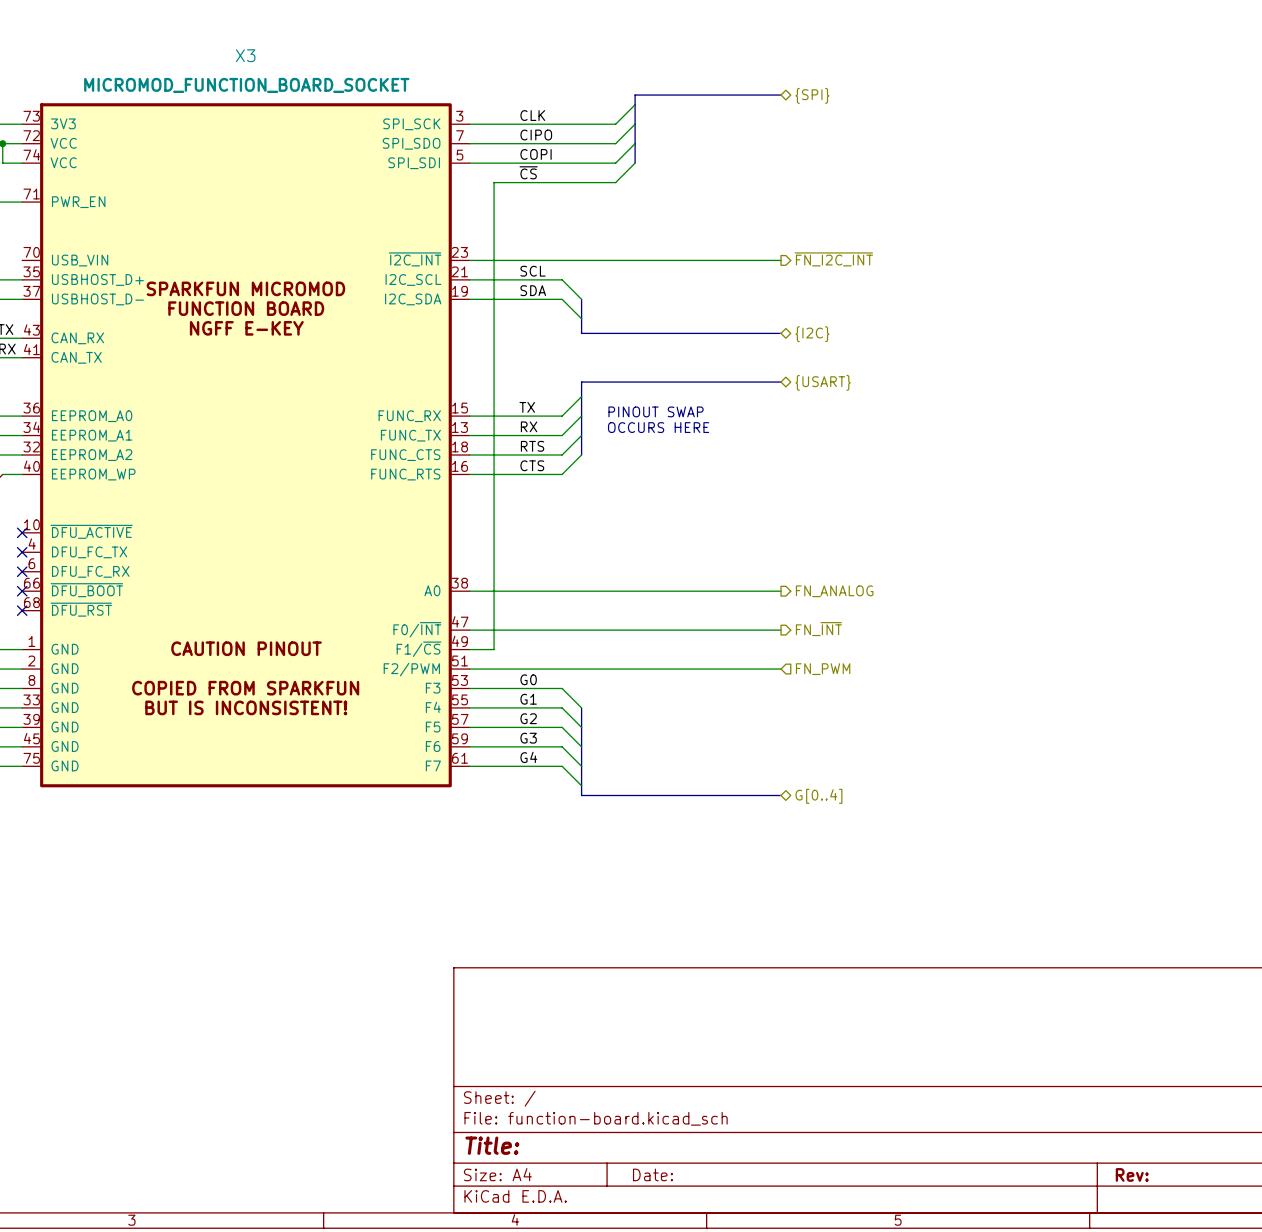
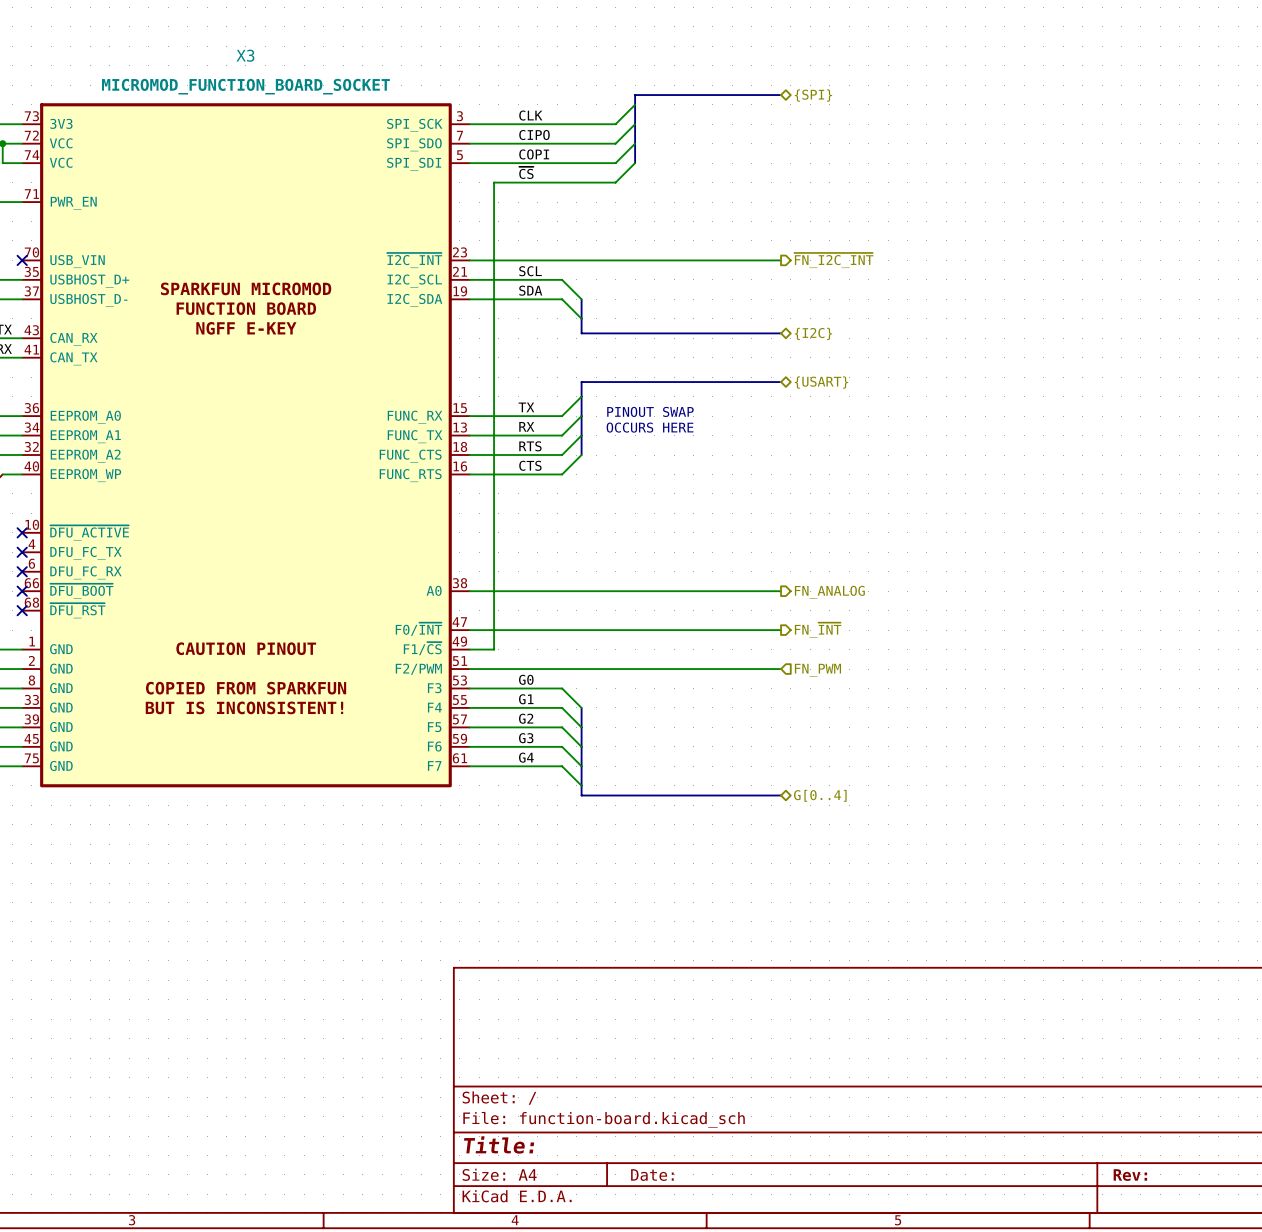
no-connect mark: none -> (22, 260)

